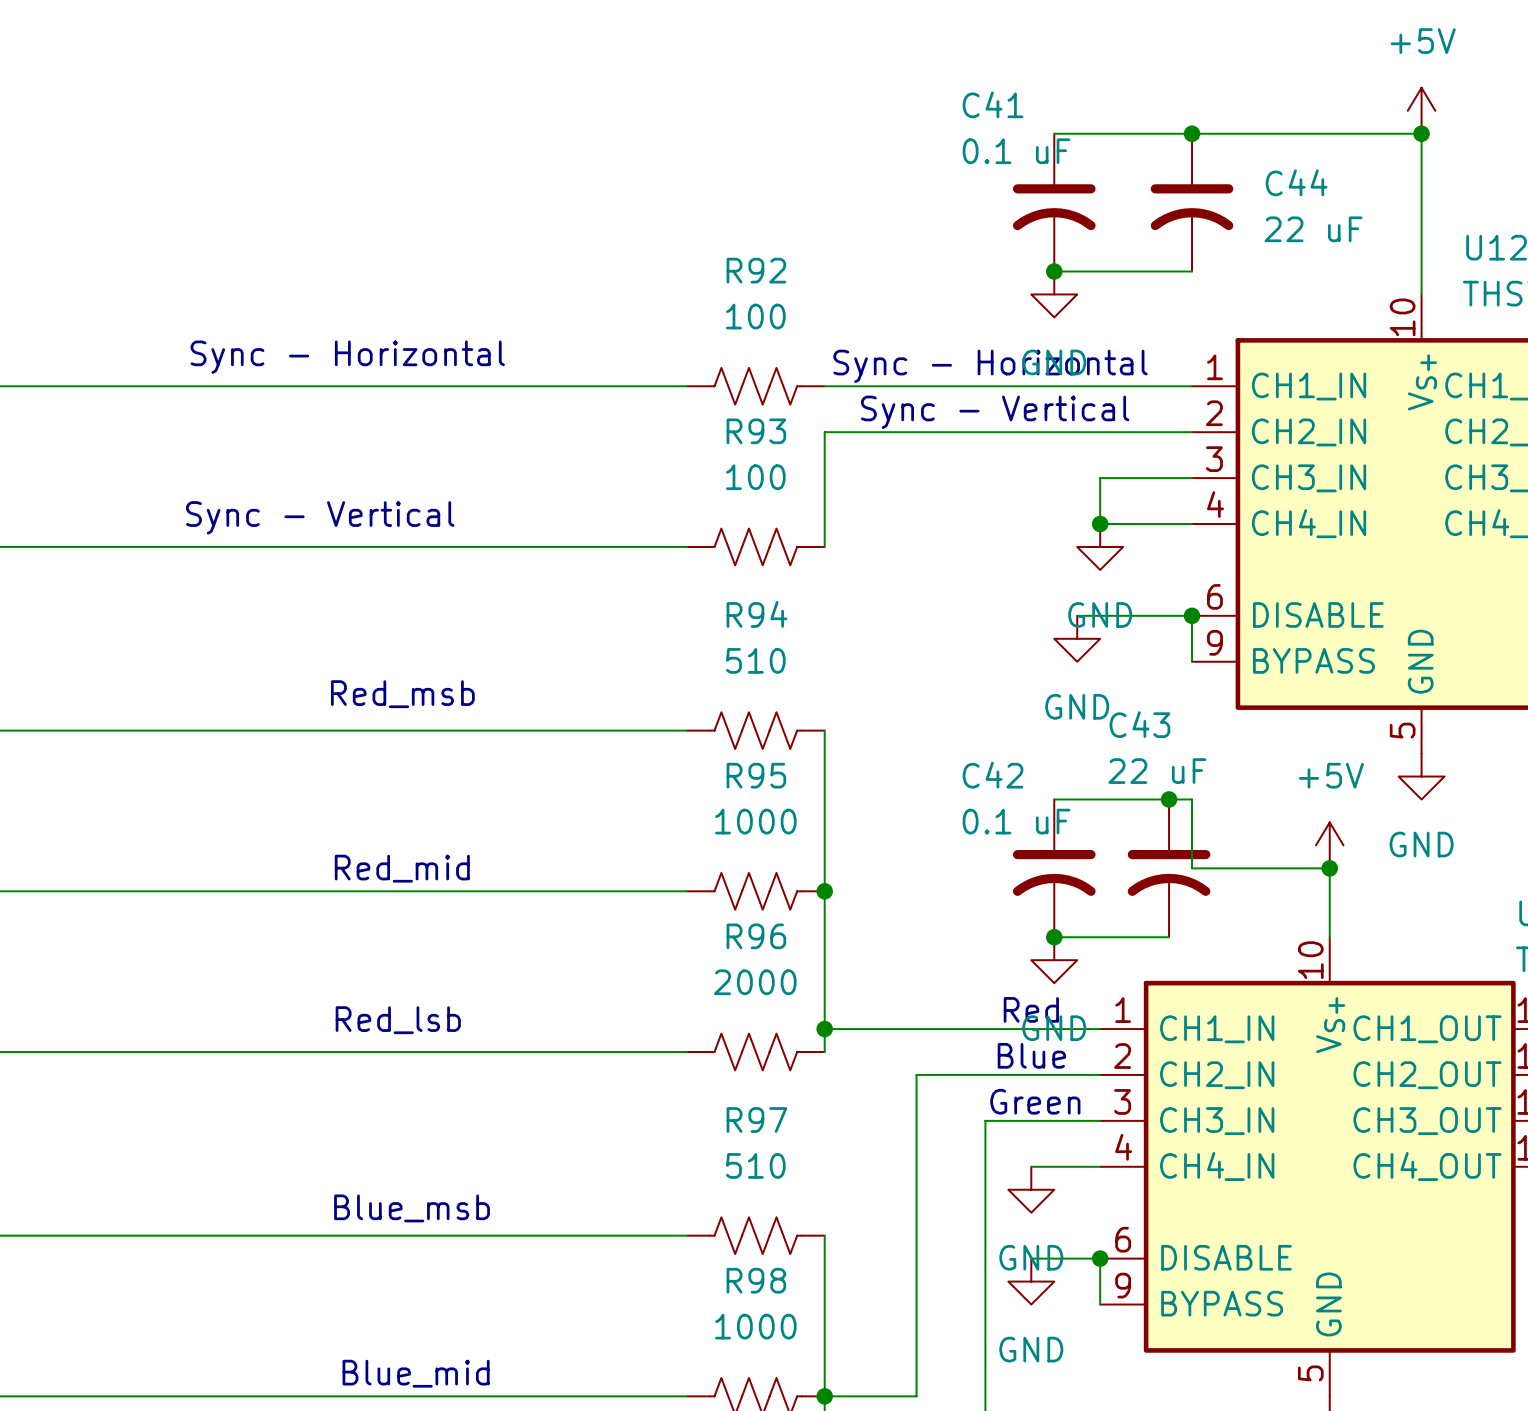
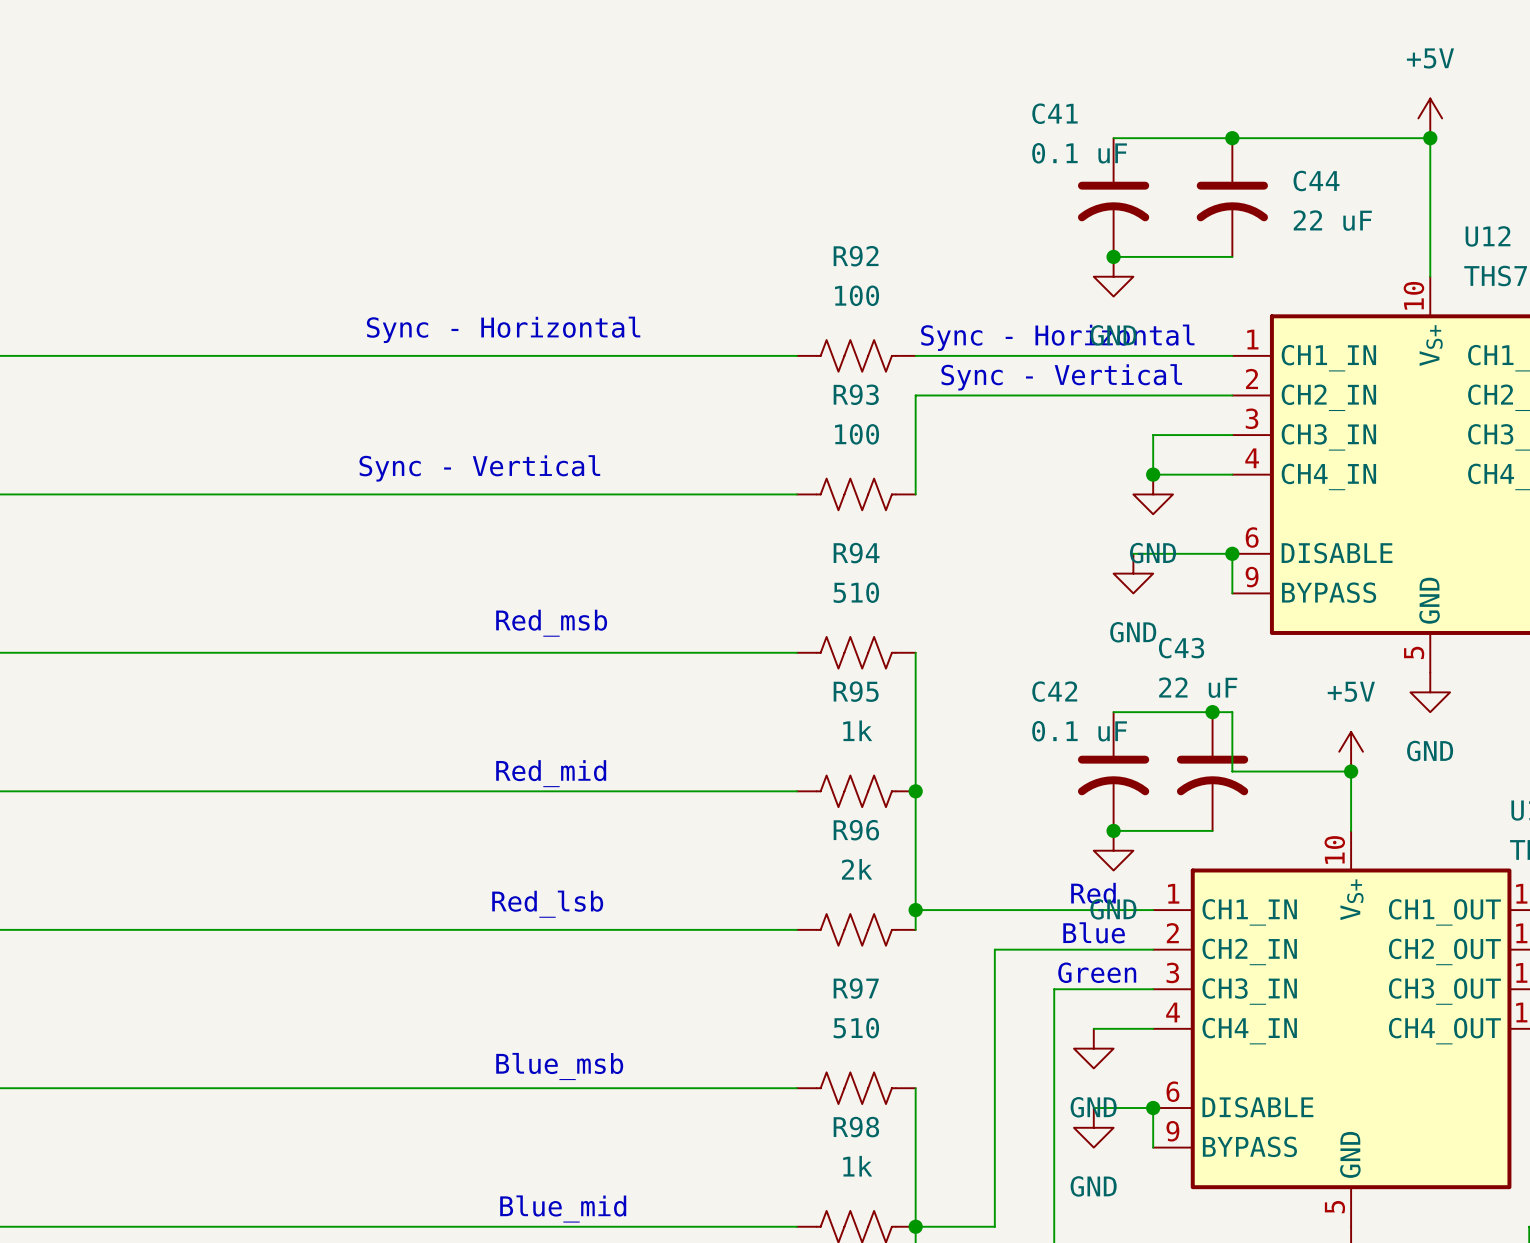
R95 value: 1000 (755, 821) -> 1k (857, 730)
R96 value: 2000 (755, 982) -> 2k (857, 869)
R98 value: 1000 (755, 1326) -> 1k (857, 1166)

